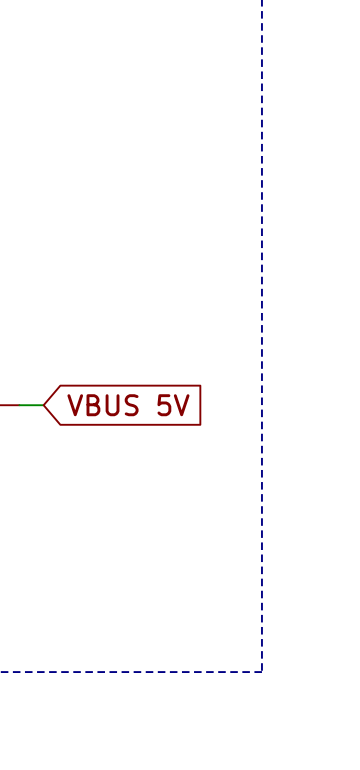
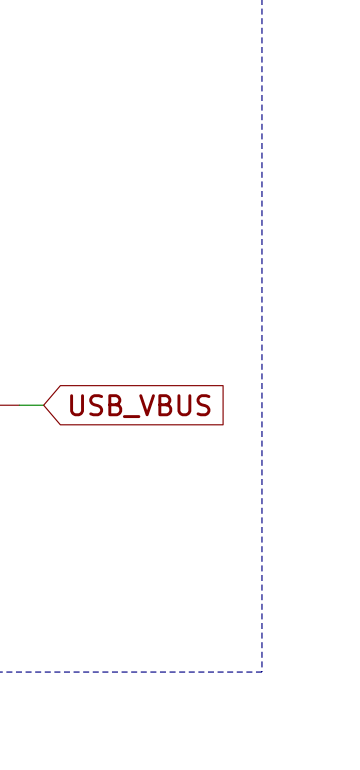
global label: VBUS 5V (128, 405) -> USB_VBUS (140, 406)

